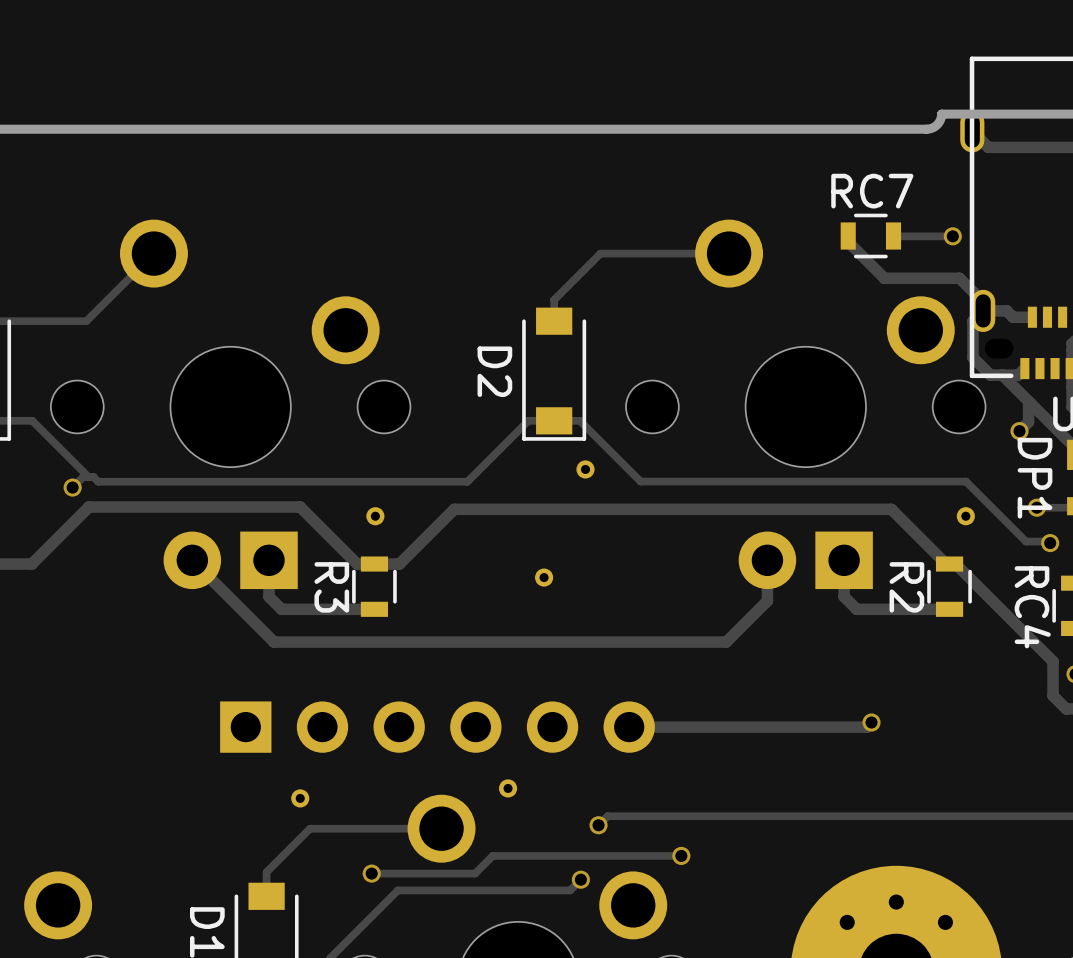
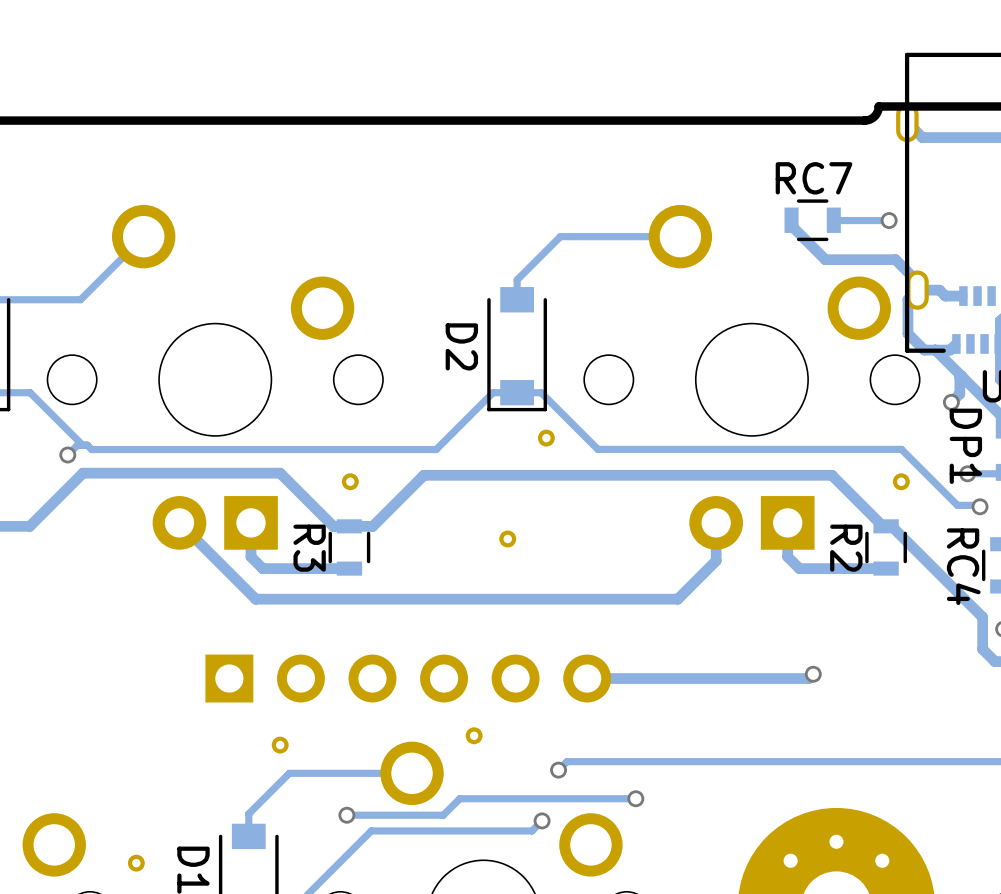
part: none -> (136, 863)

